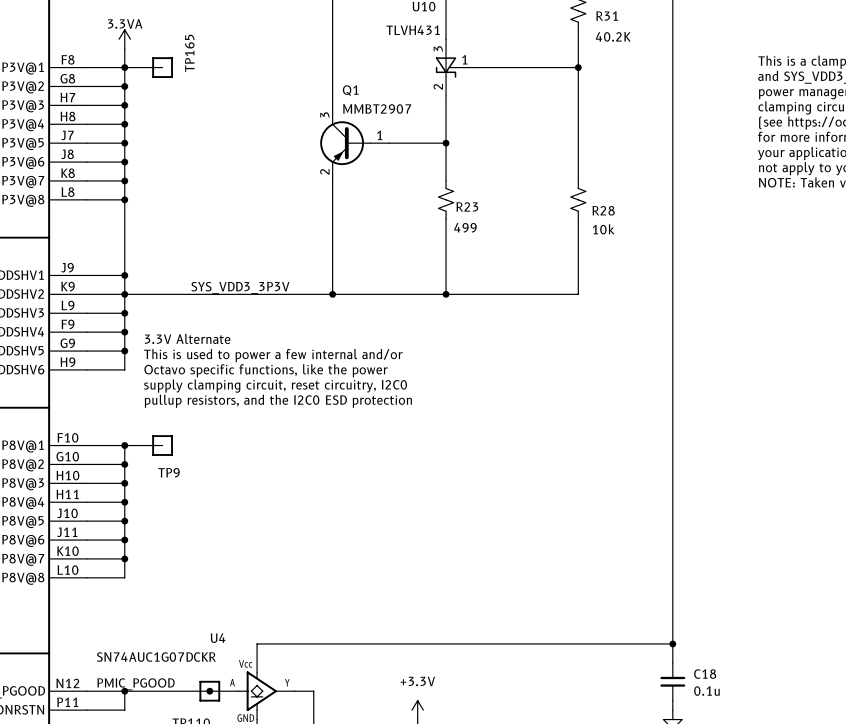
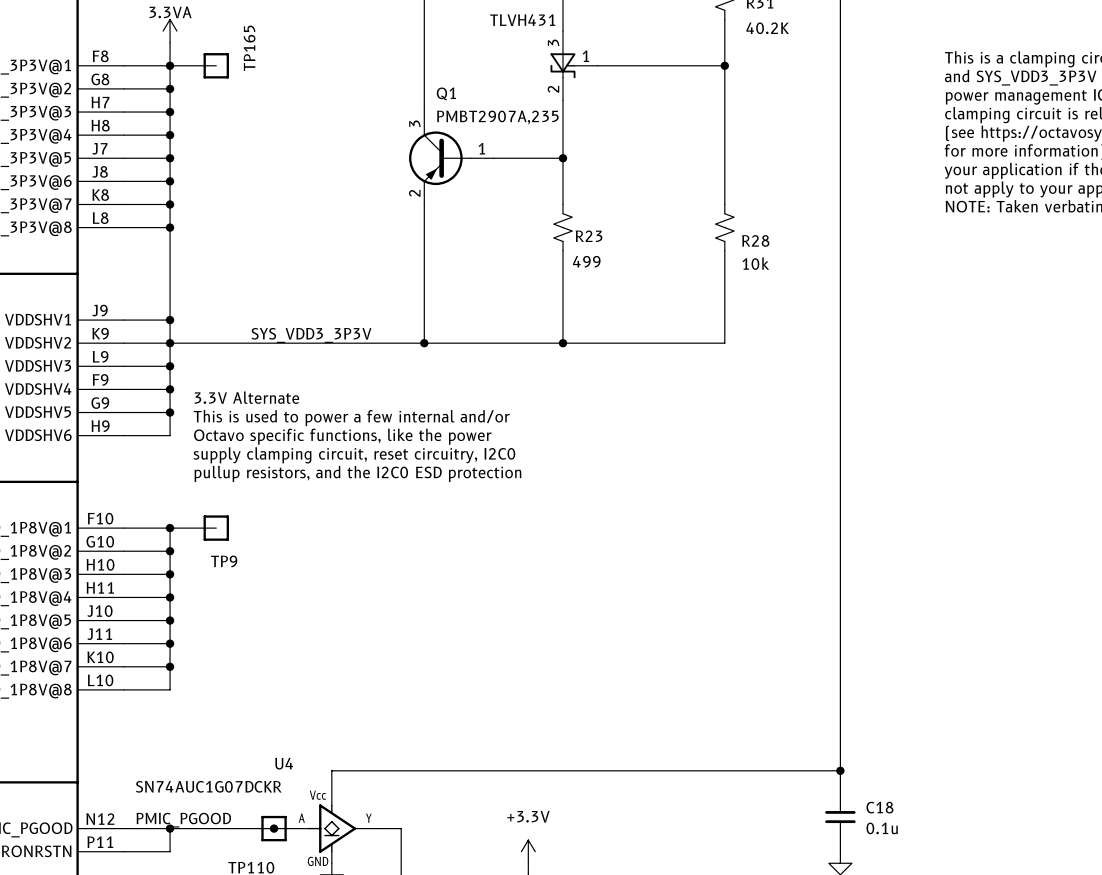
Q1 value: MMBT2907 (377, 108) -> PMBT2907A,235 (497, 117)

